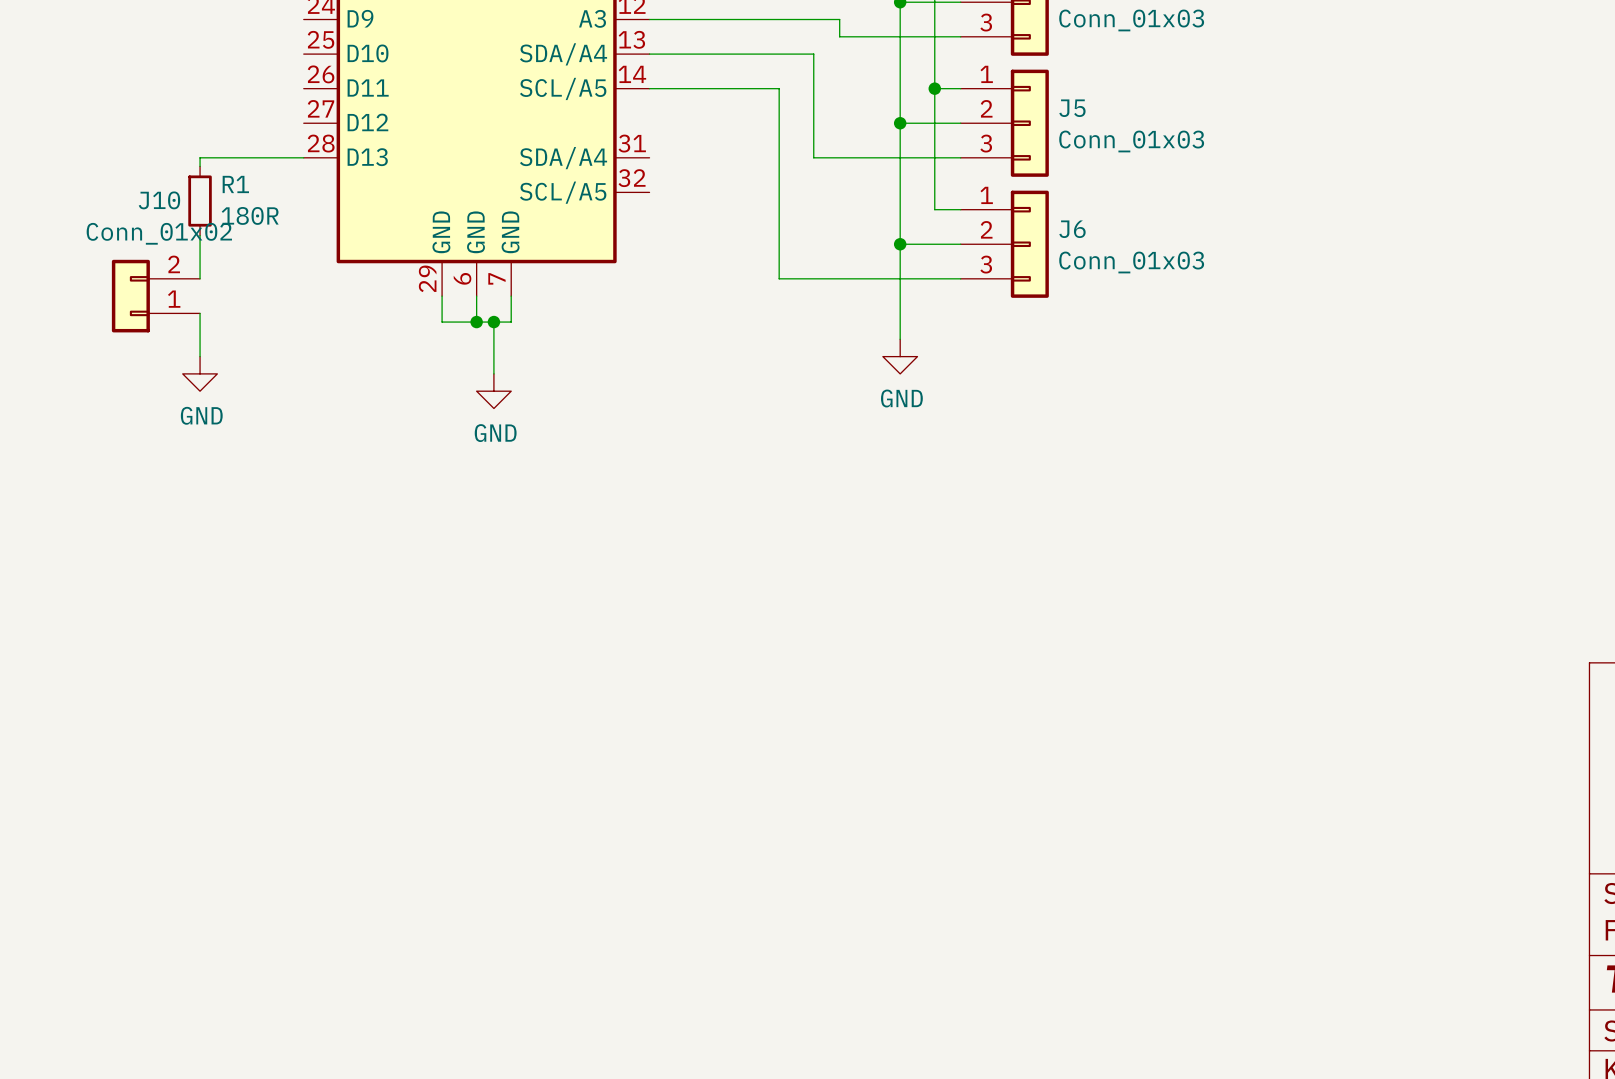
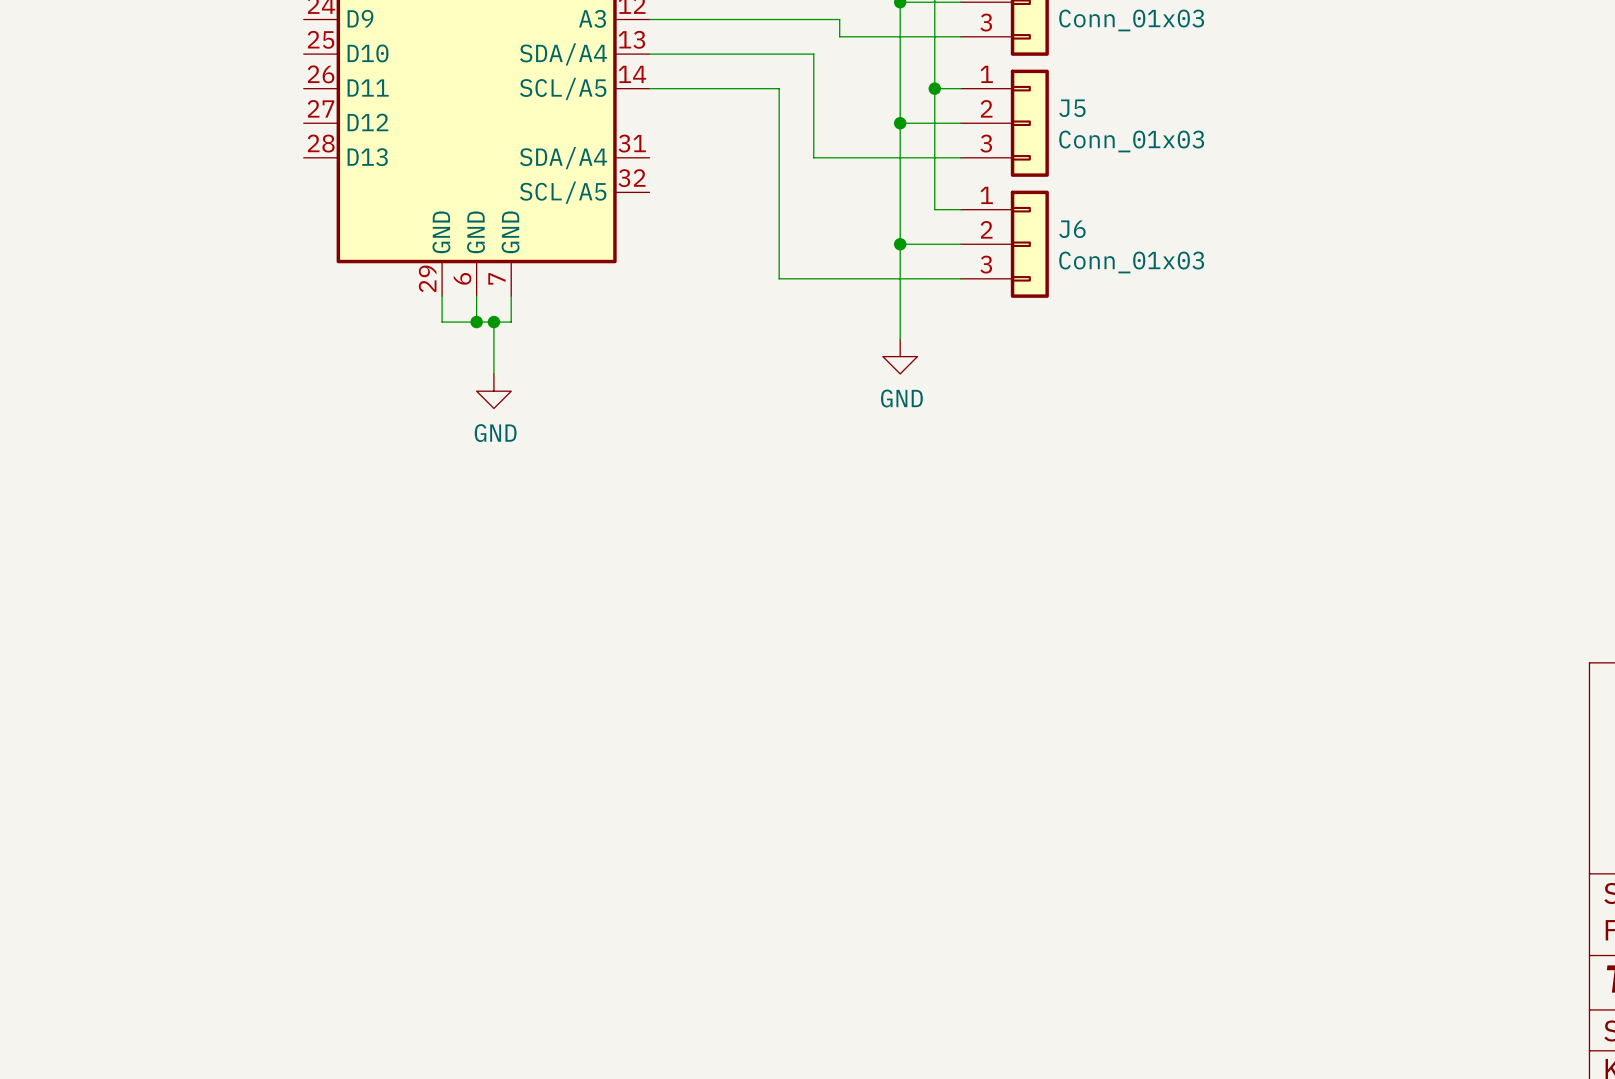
wire: (303, 157) (200, 157) (200, 166) -> none
R1: 180R (200, 201) -> none
wire: (200, 235) (200, 278) -> none
J10: Conn_01x02 (155, 296) -> none
wire: (200, 313) (200, 356) -> none
power symbol: GND (200, 373) -> none

